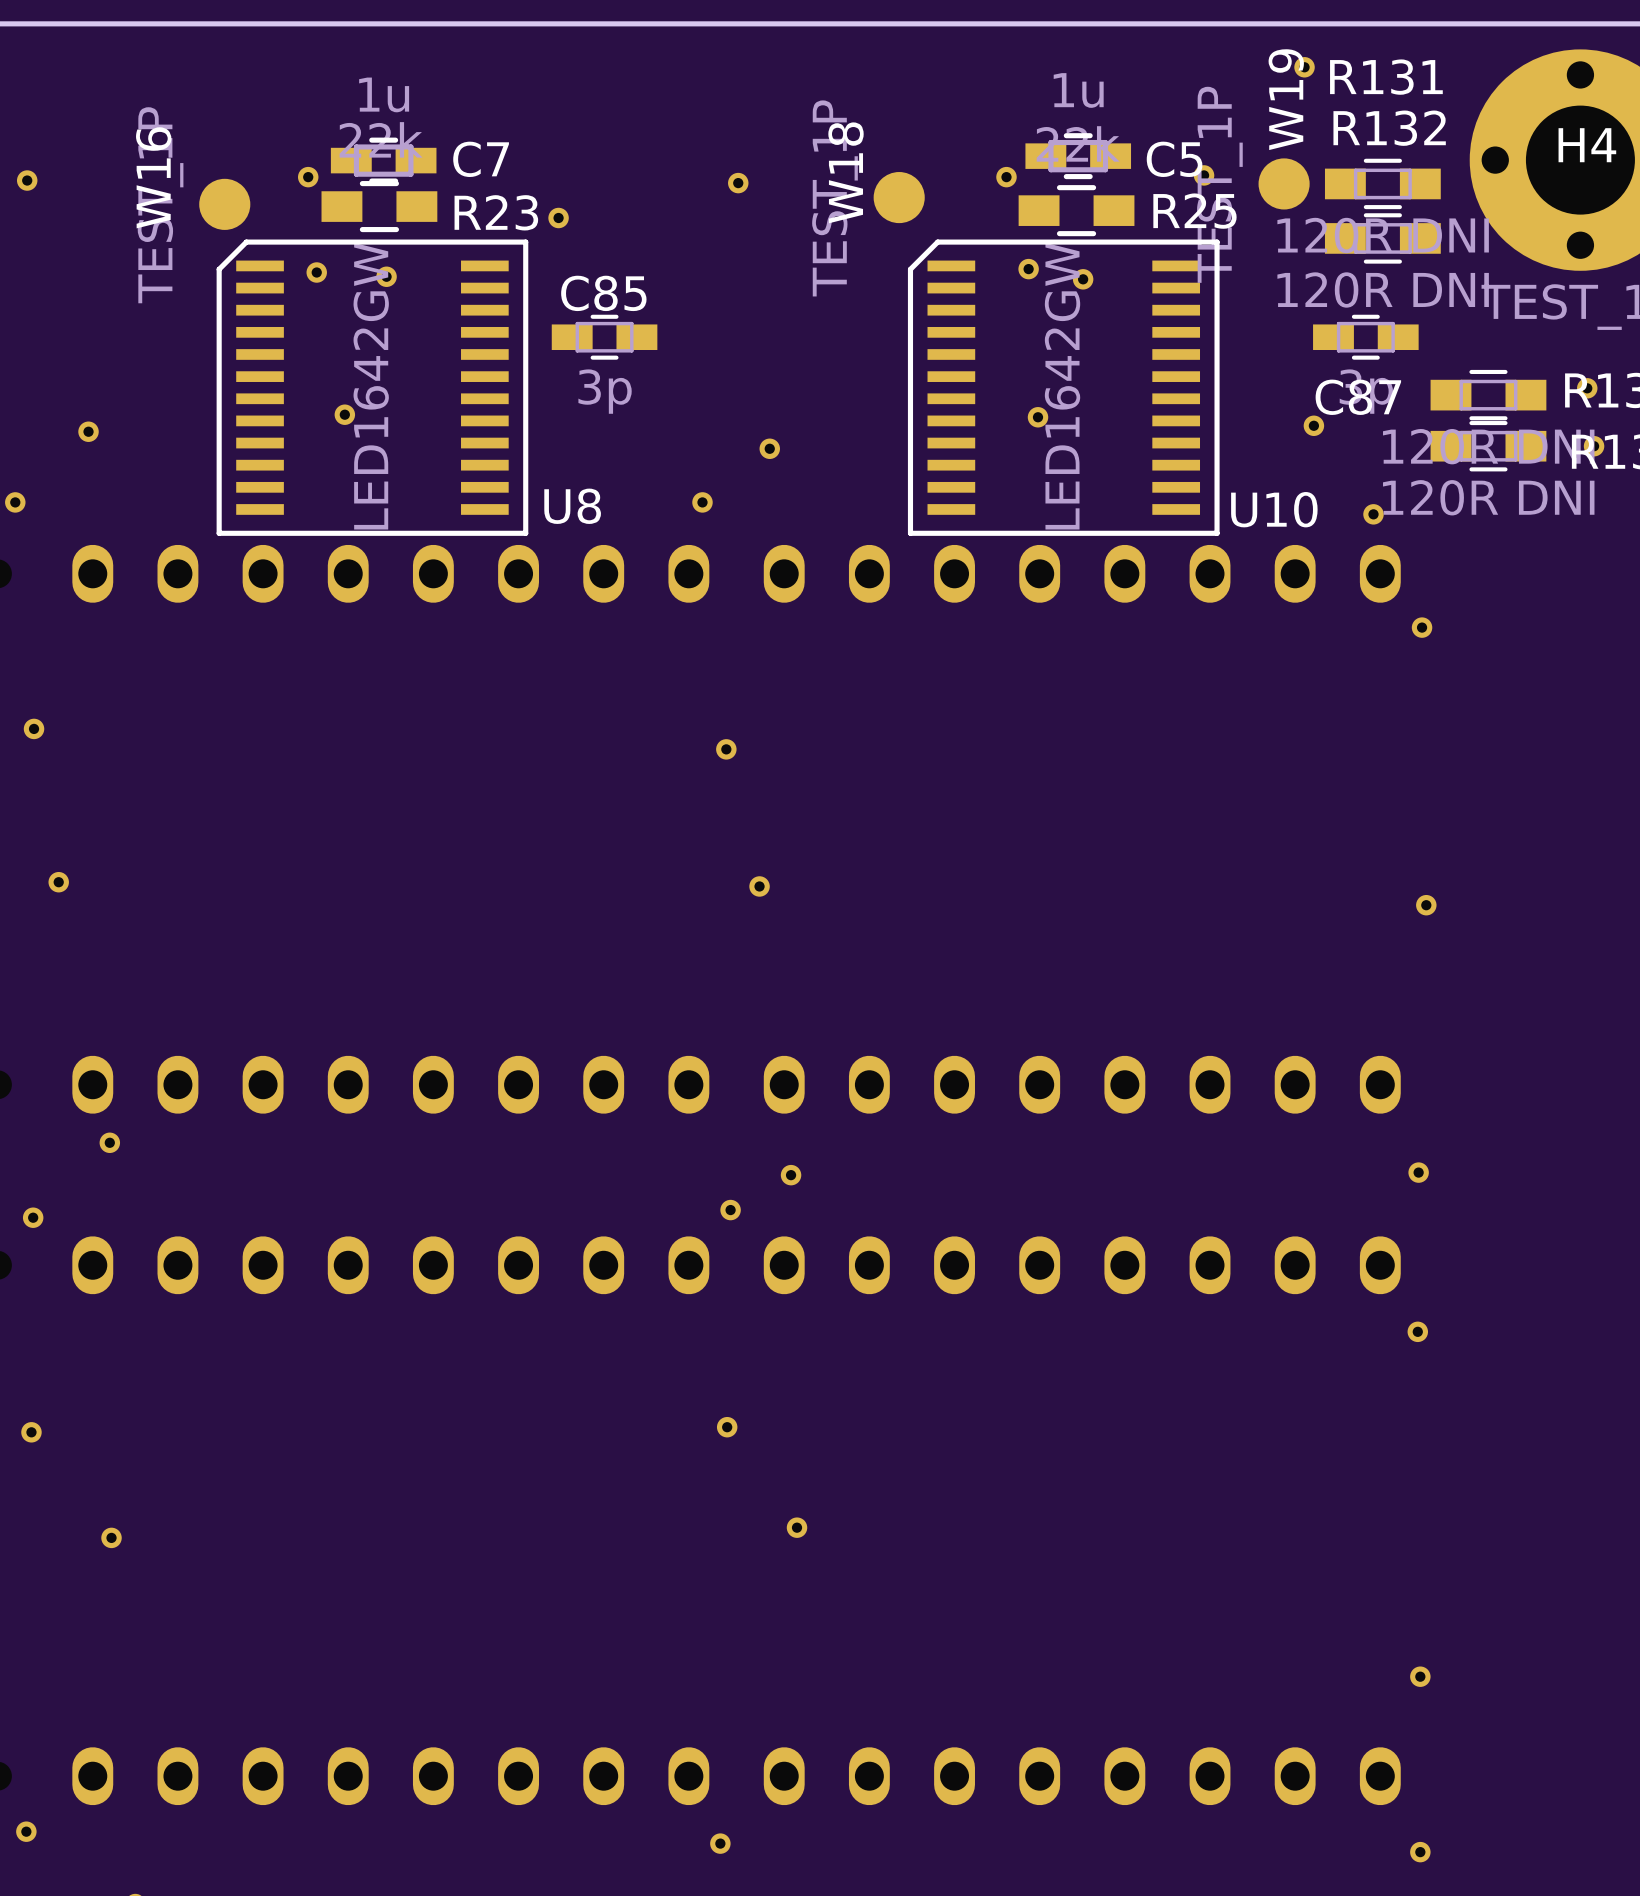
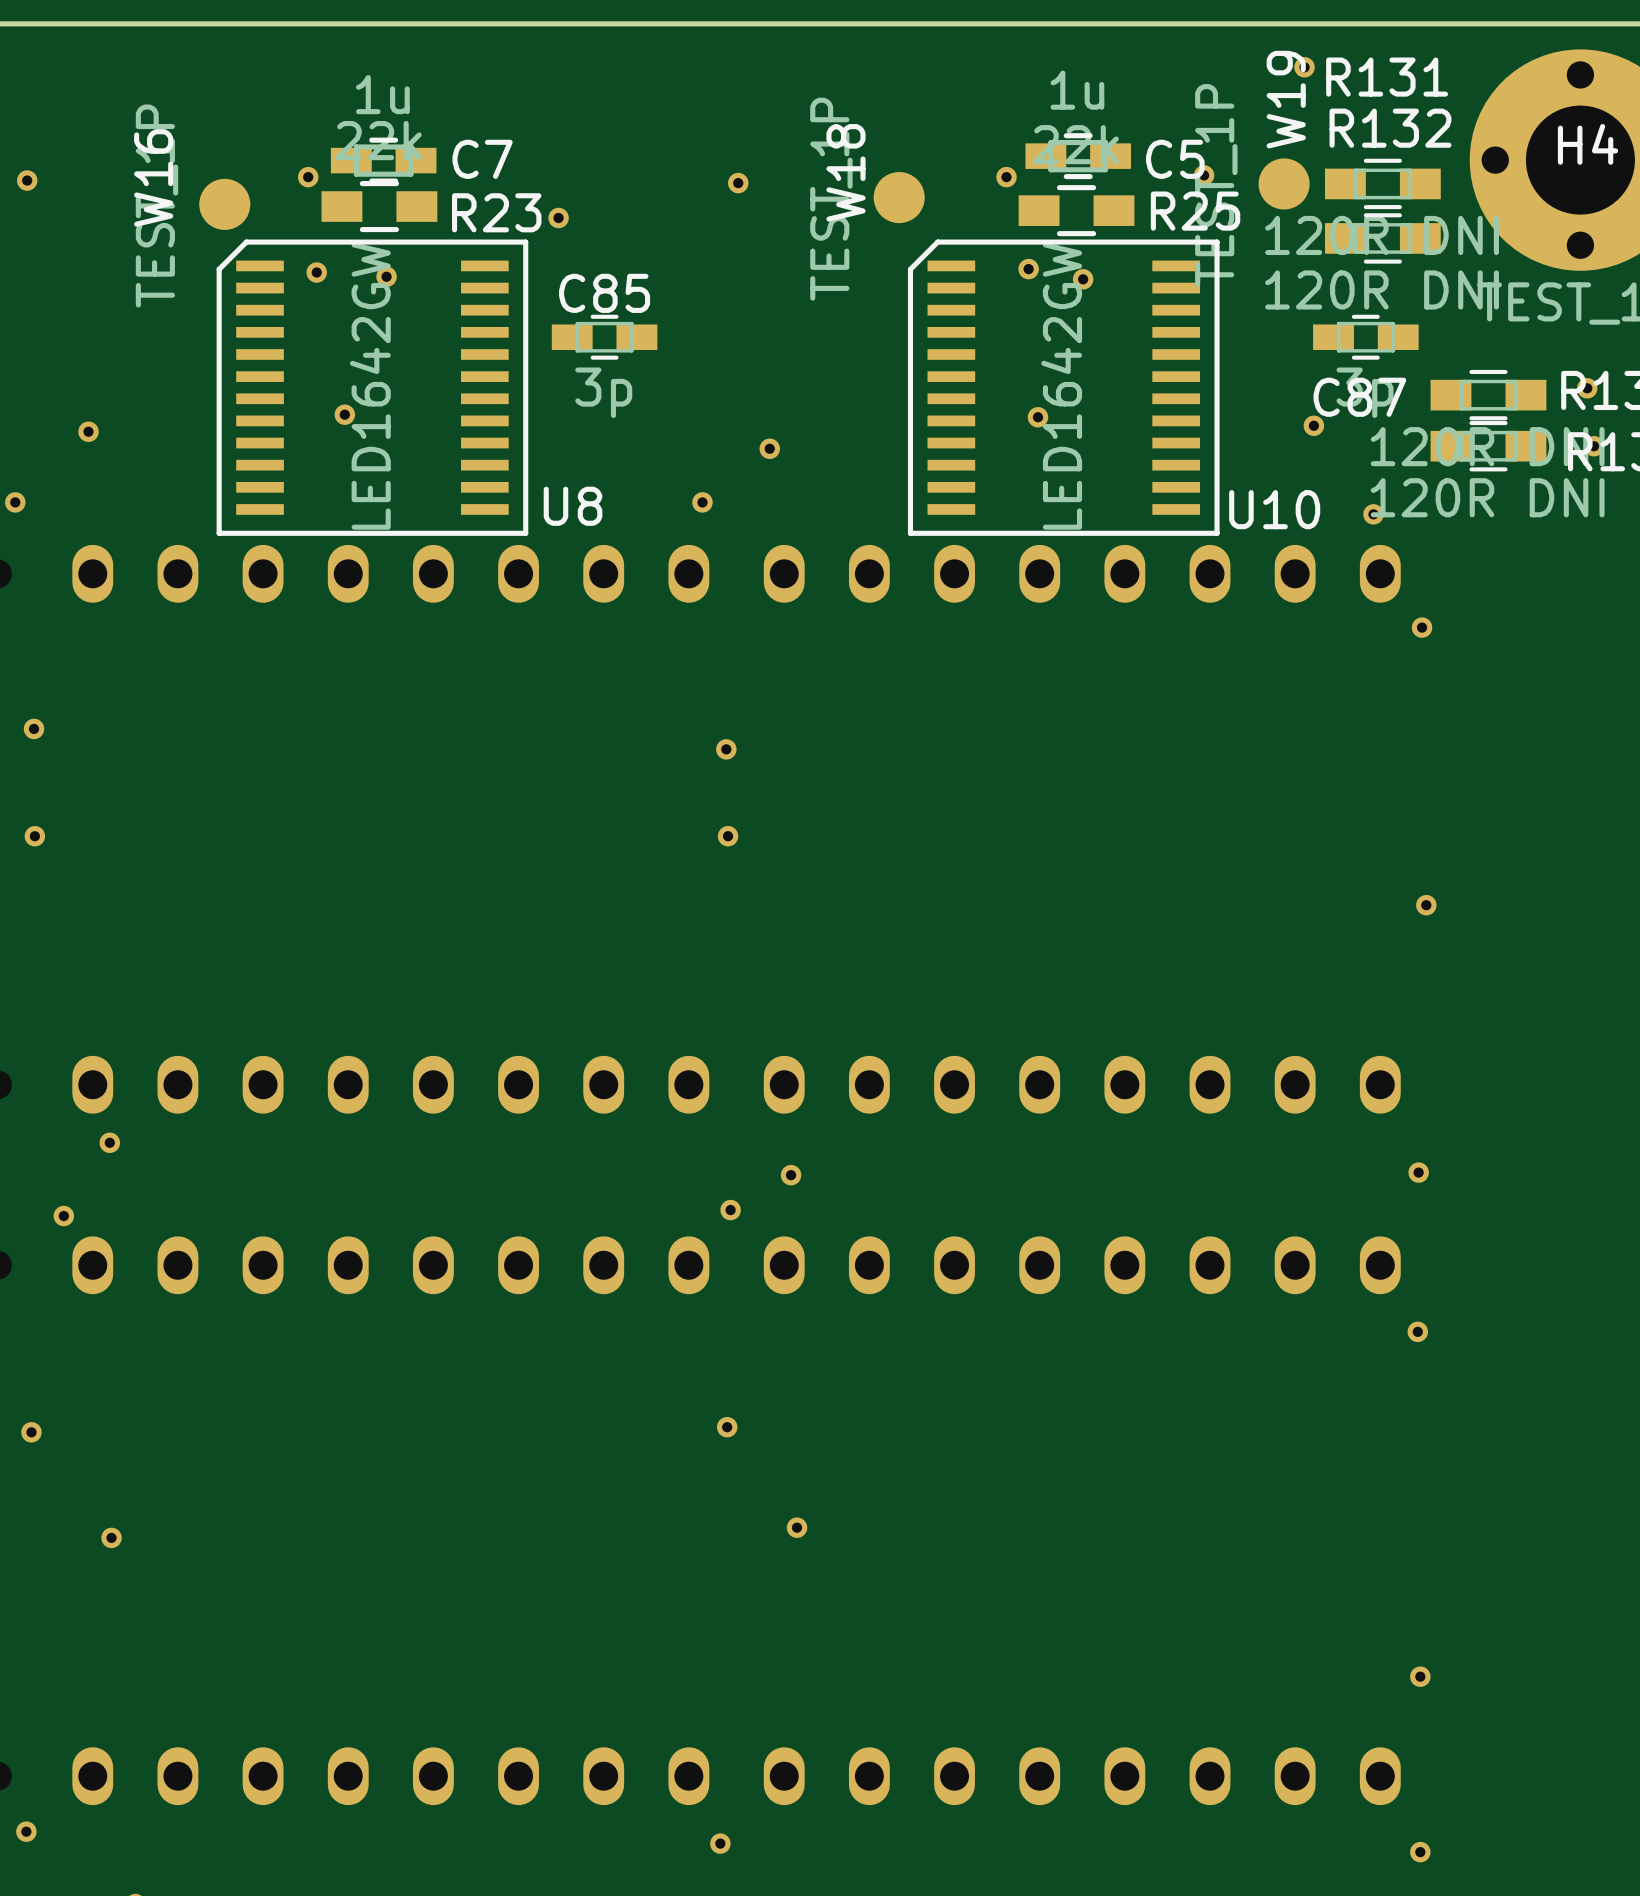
part position: (58, 882) -> (34, 836)
part position: (759, 886) -> (728, 836)
part position: (33, 1217) -> (63, 1216)

